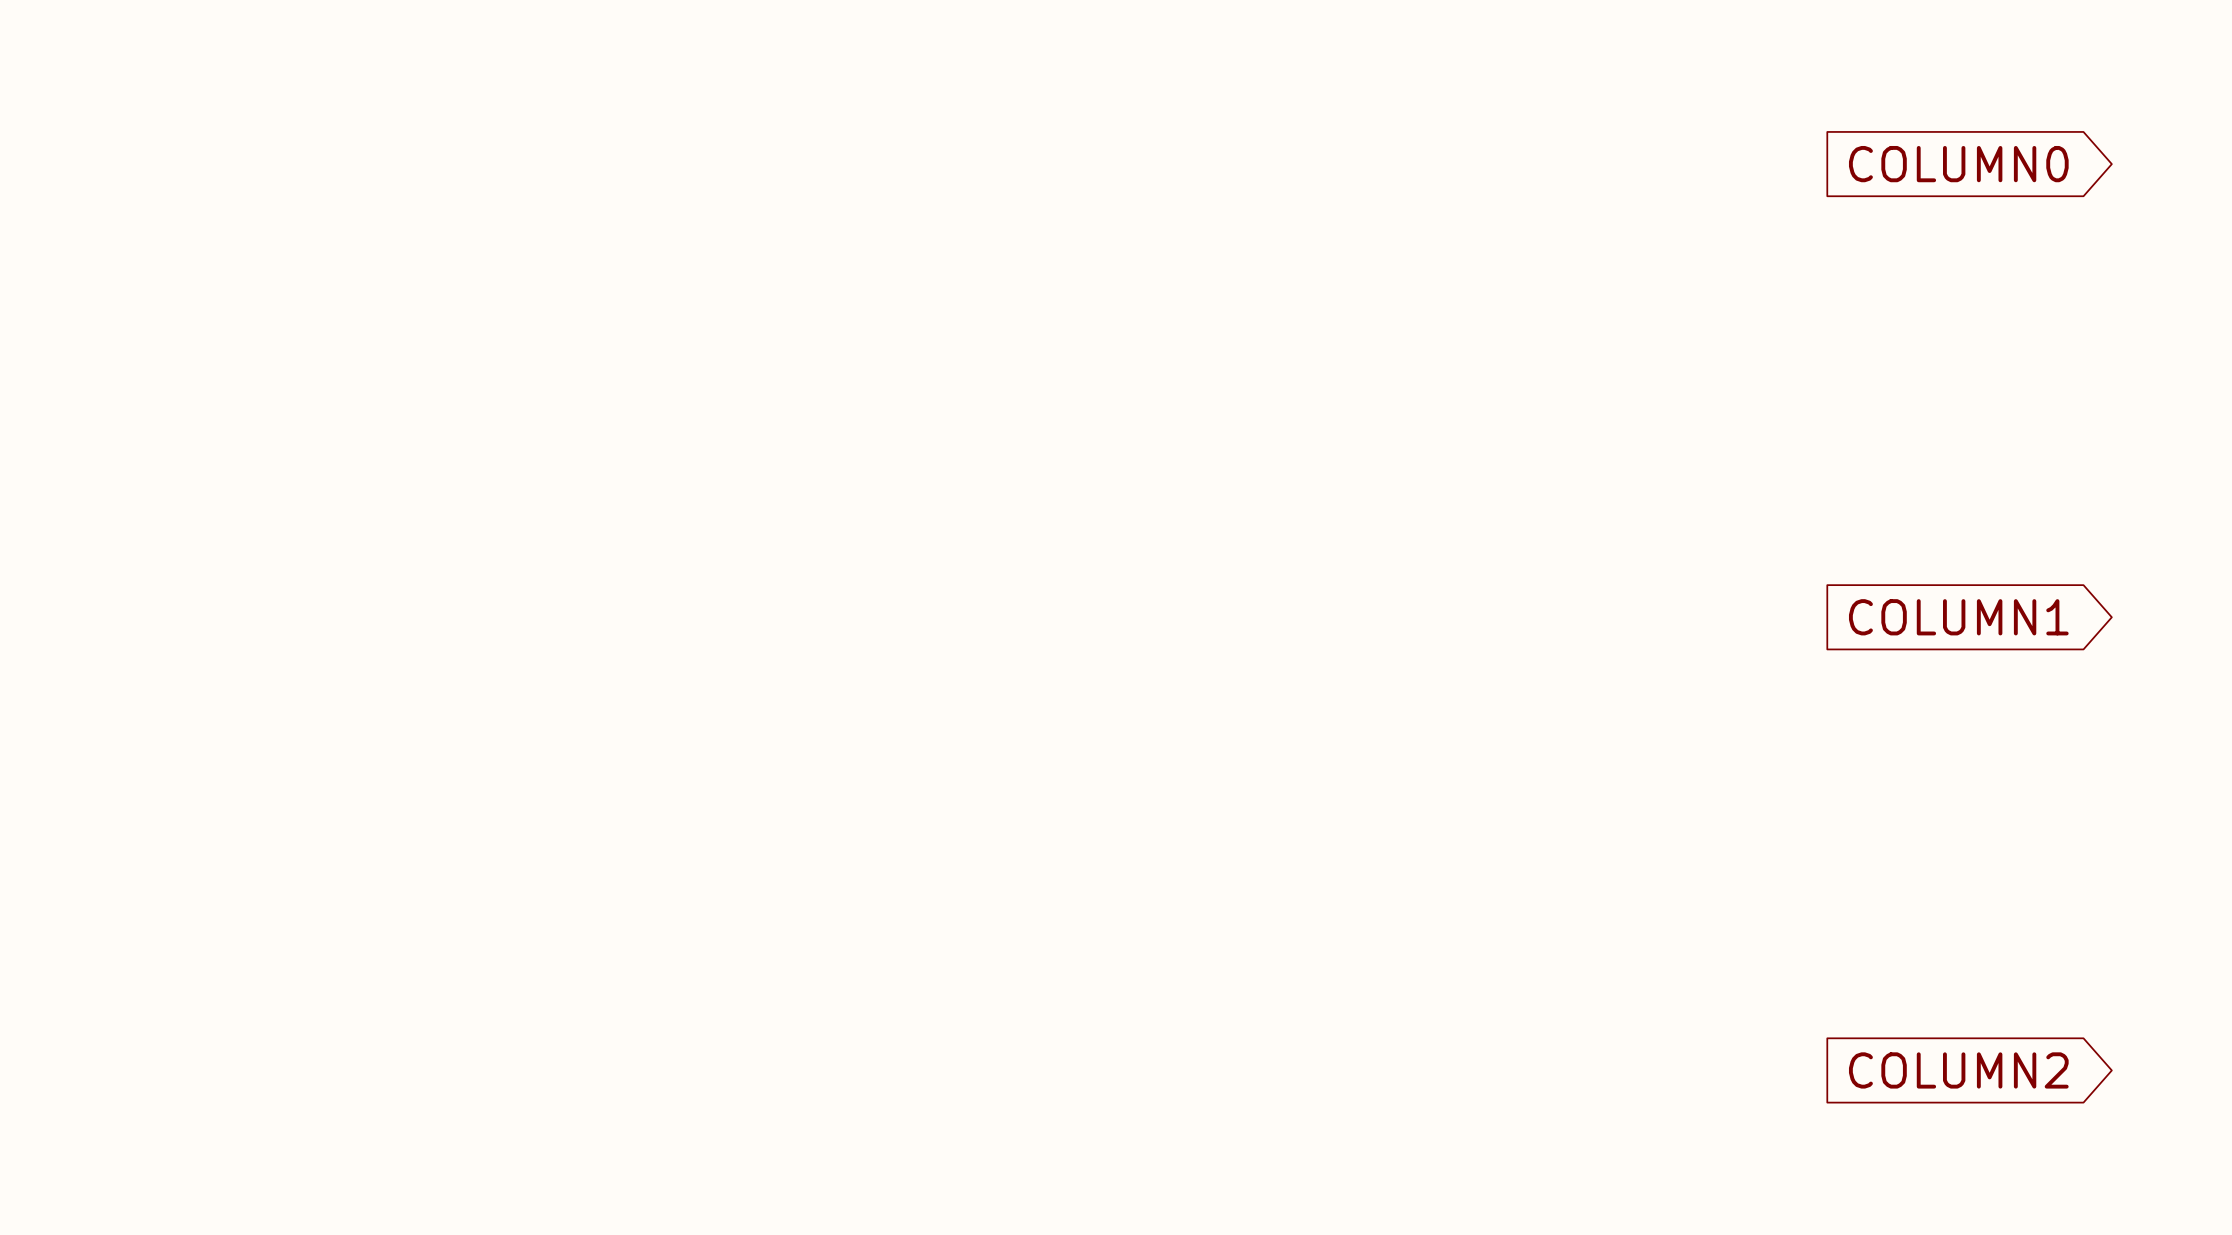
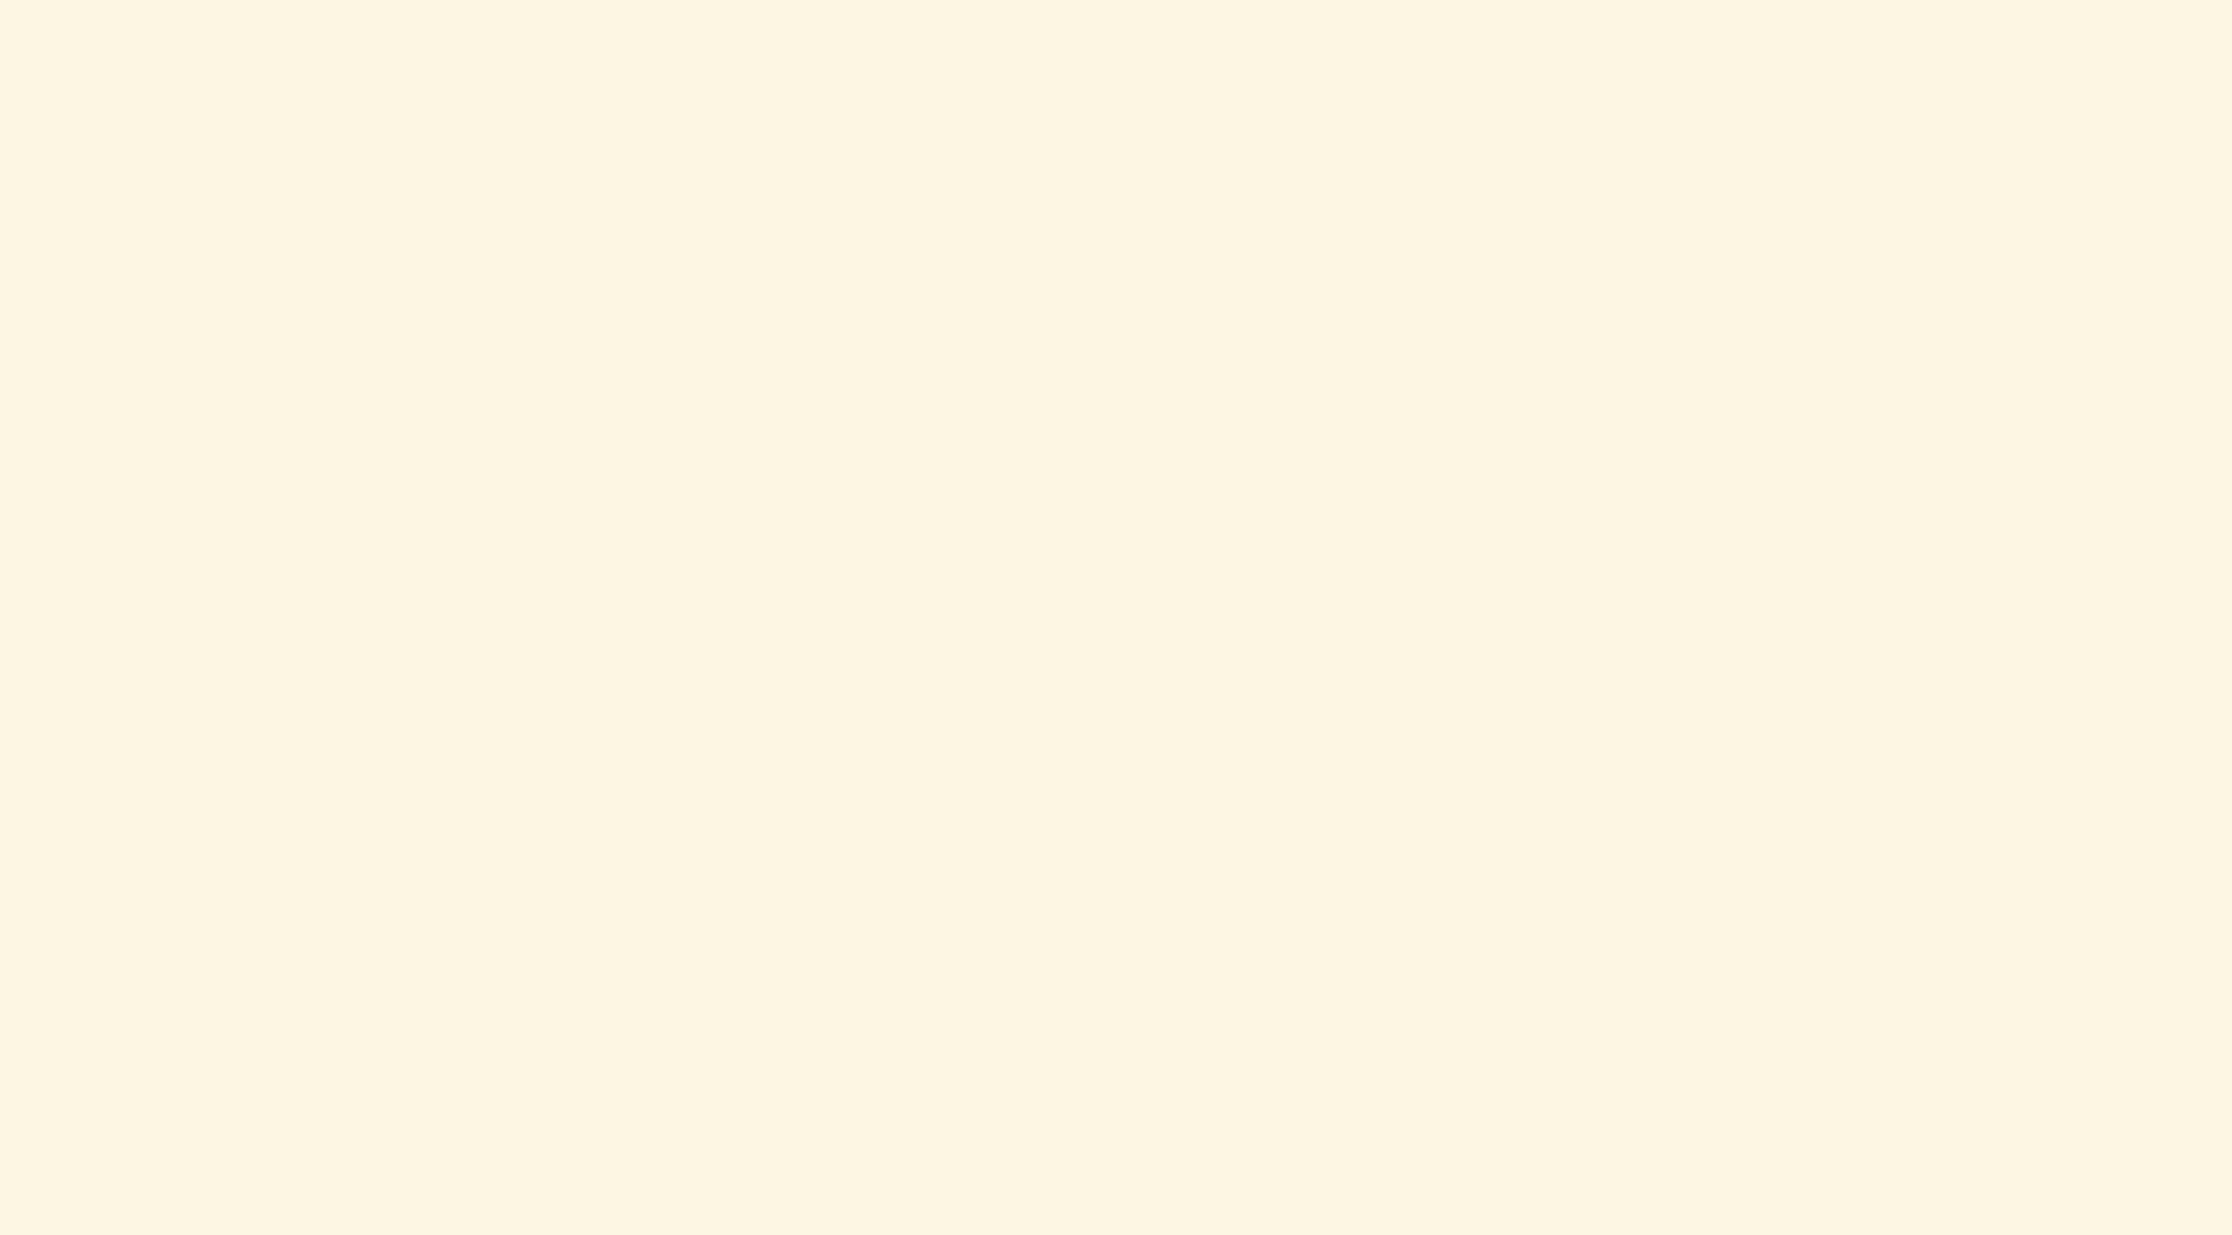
global label: COLUMN0 (1958, 164) -> none
global label: COLUMN1 (1958, 617) -> none
global label: COLUMN2 (1958, 1070) -> none

